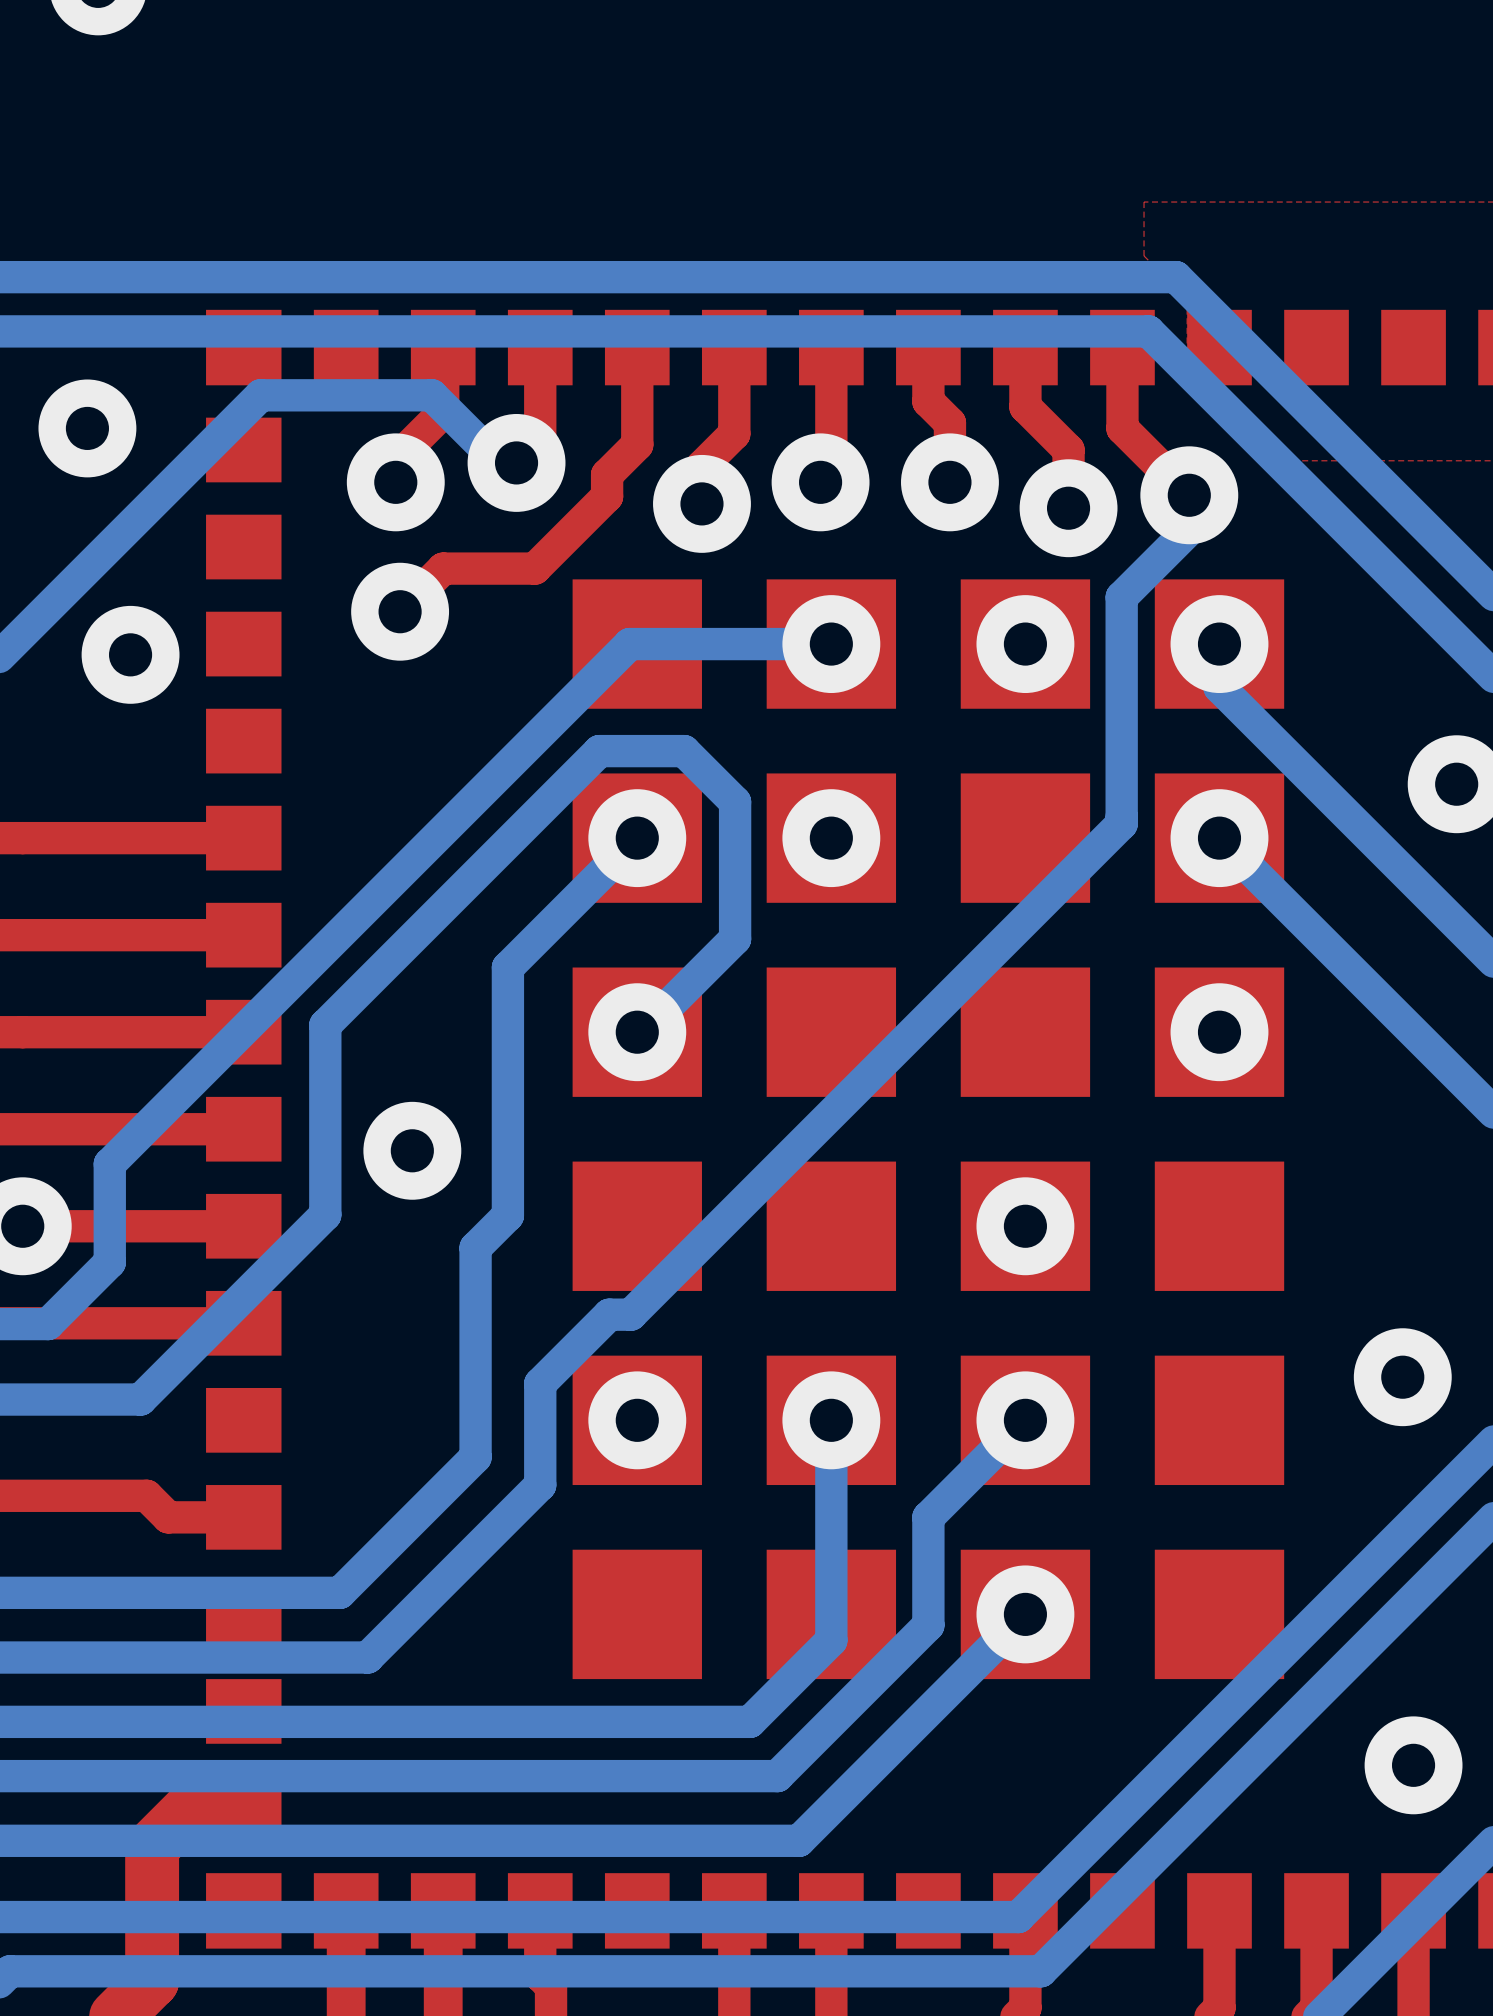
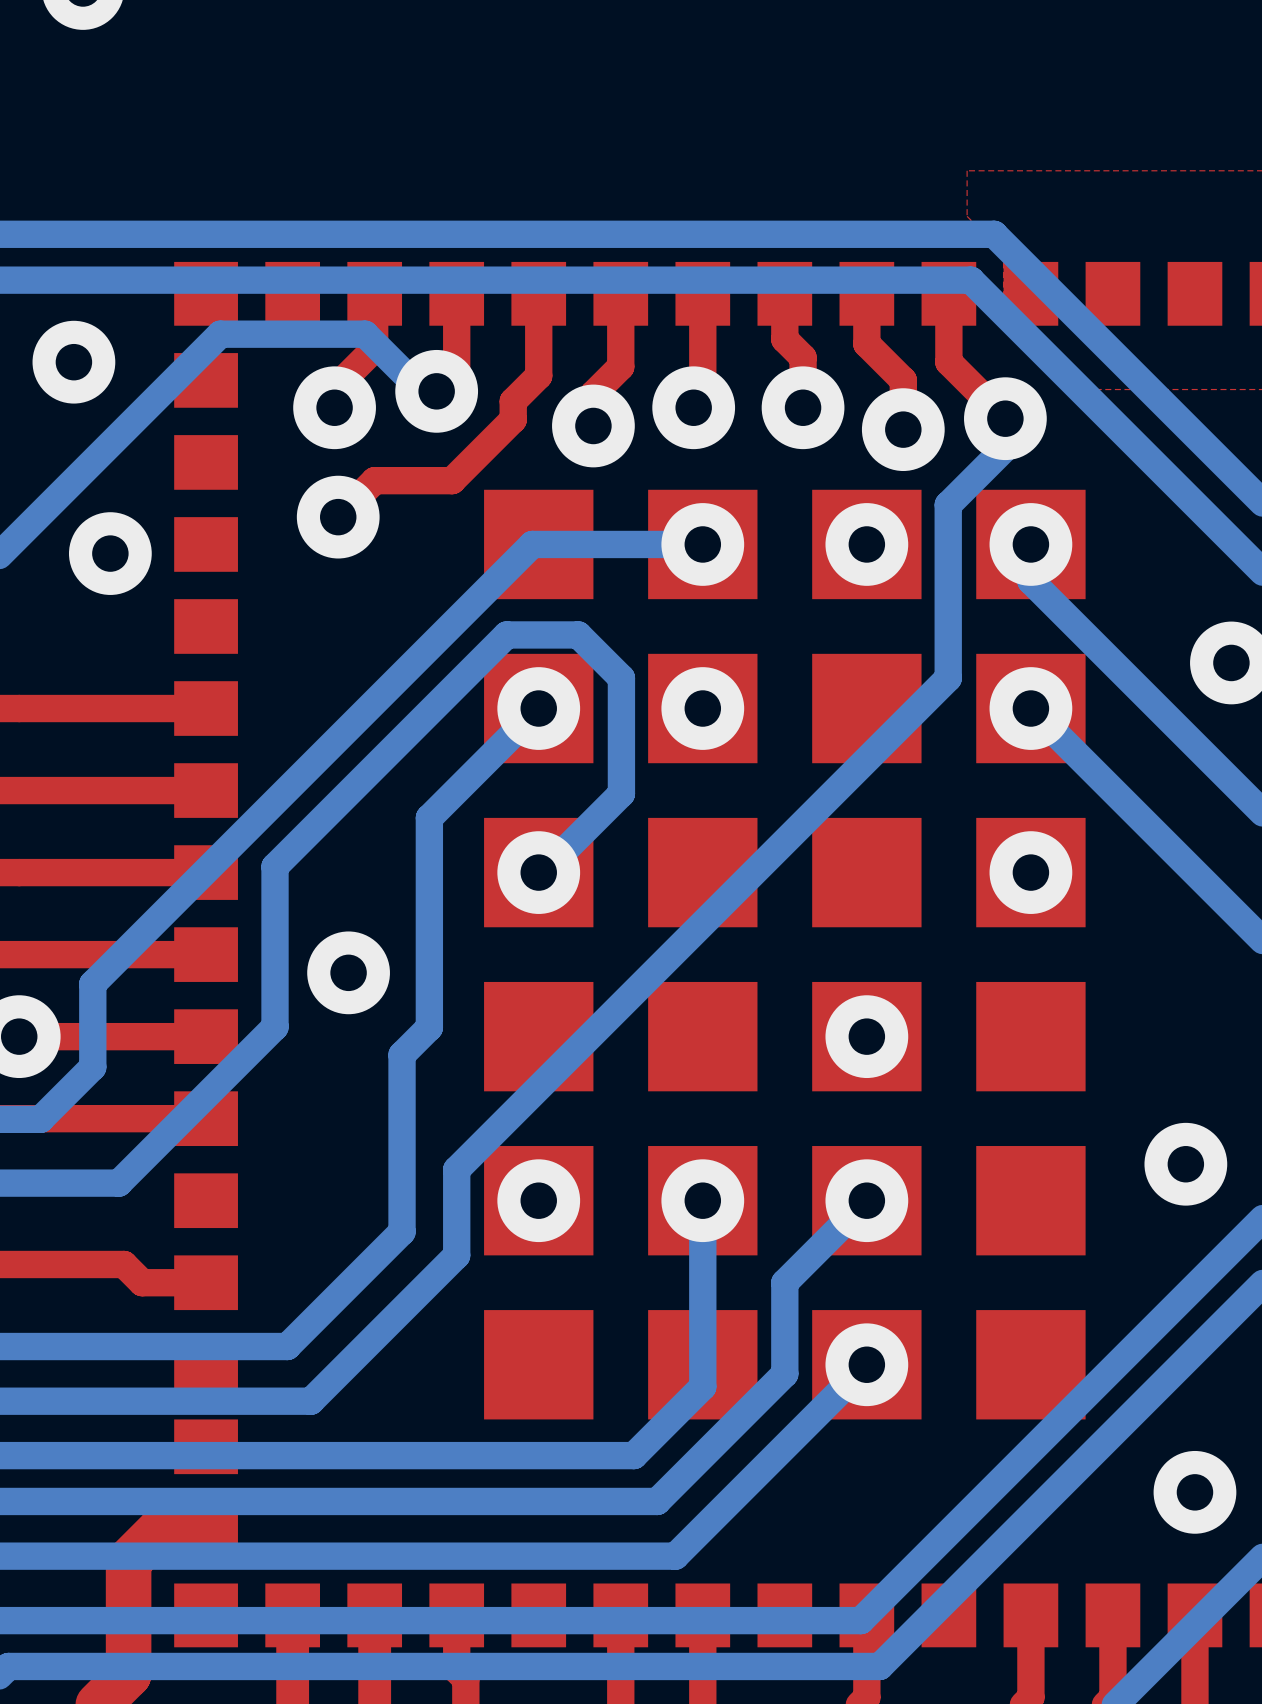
bottom track: (1121, 802) (1121, 823) (630, 1314) (609, 1314) -> (948, 678) (515, 1111)

